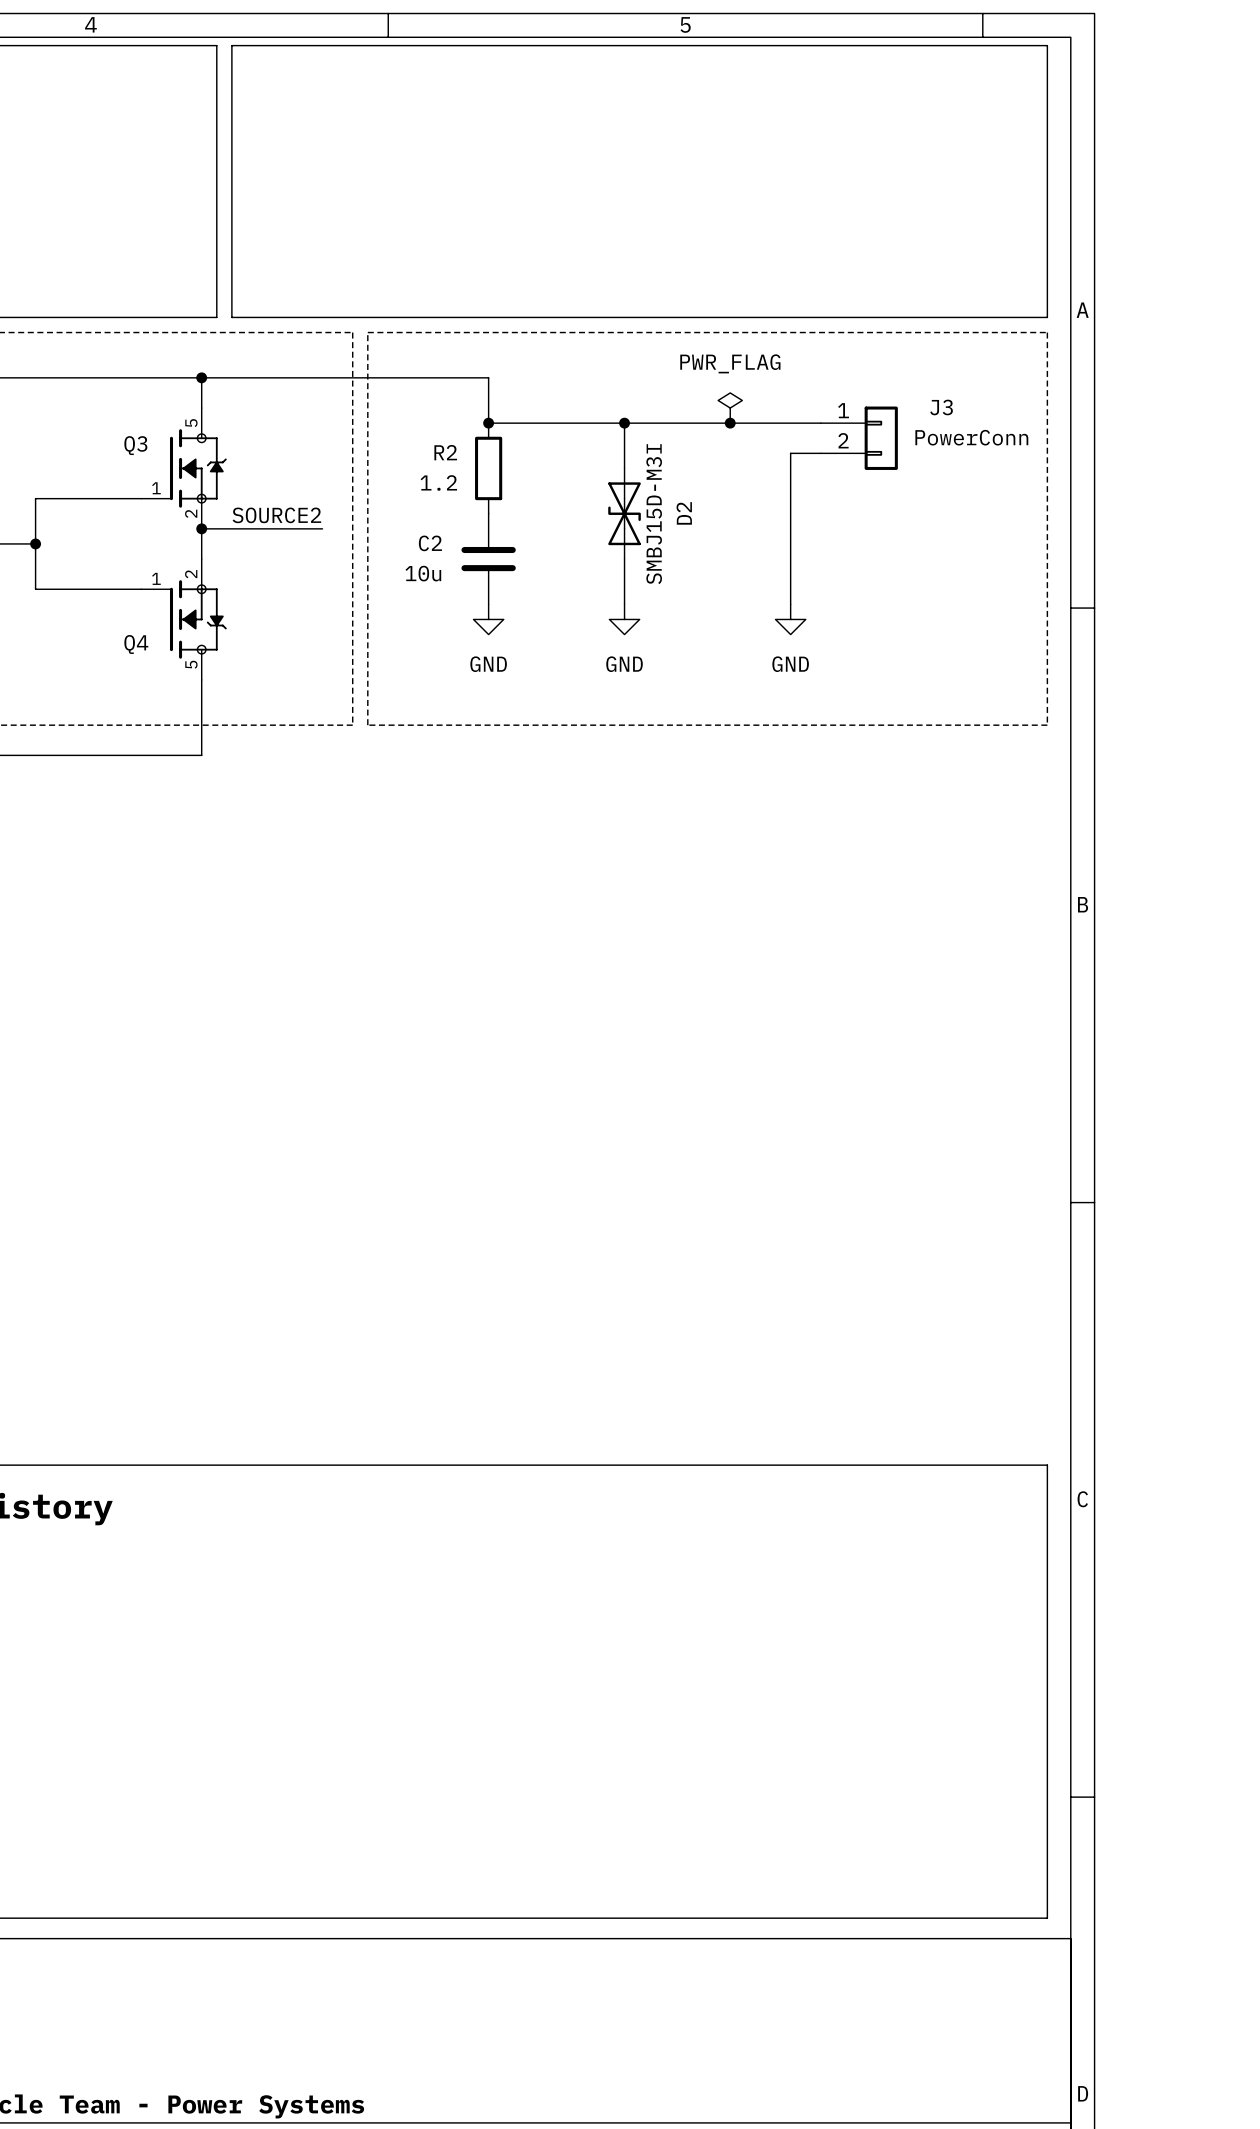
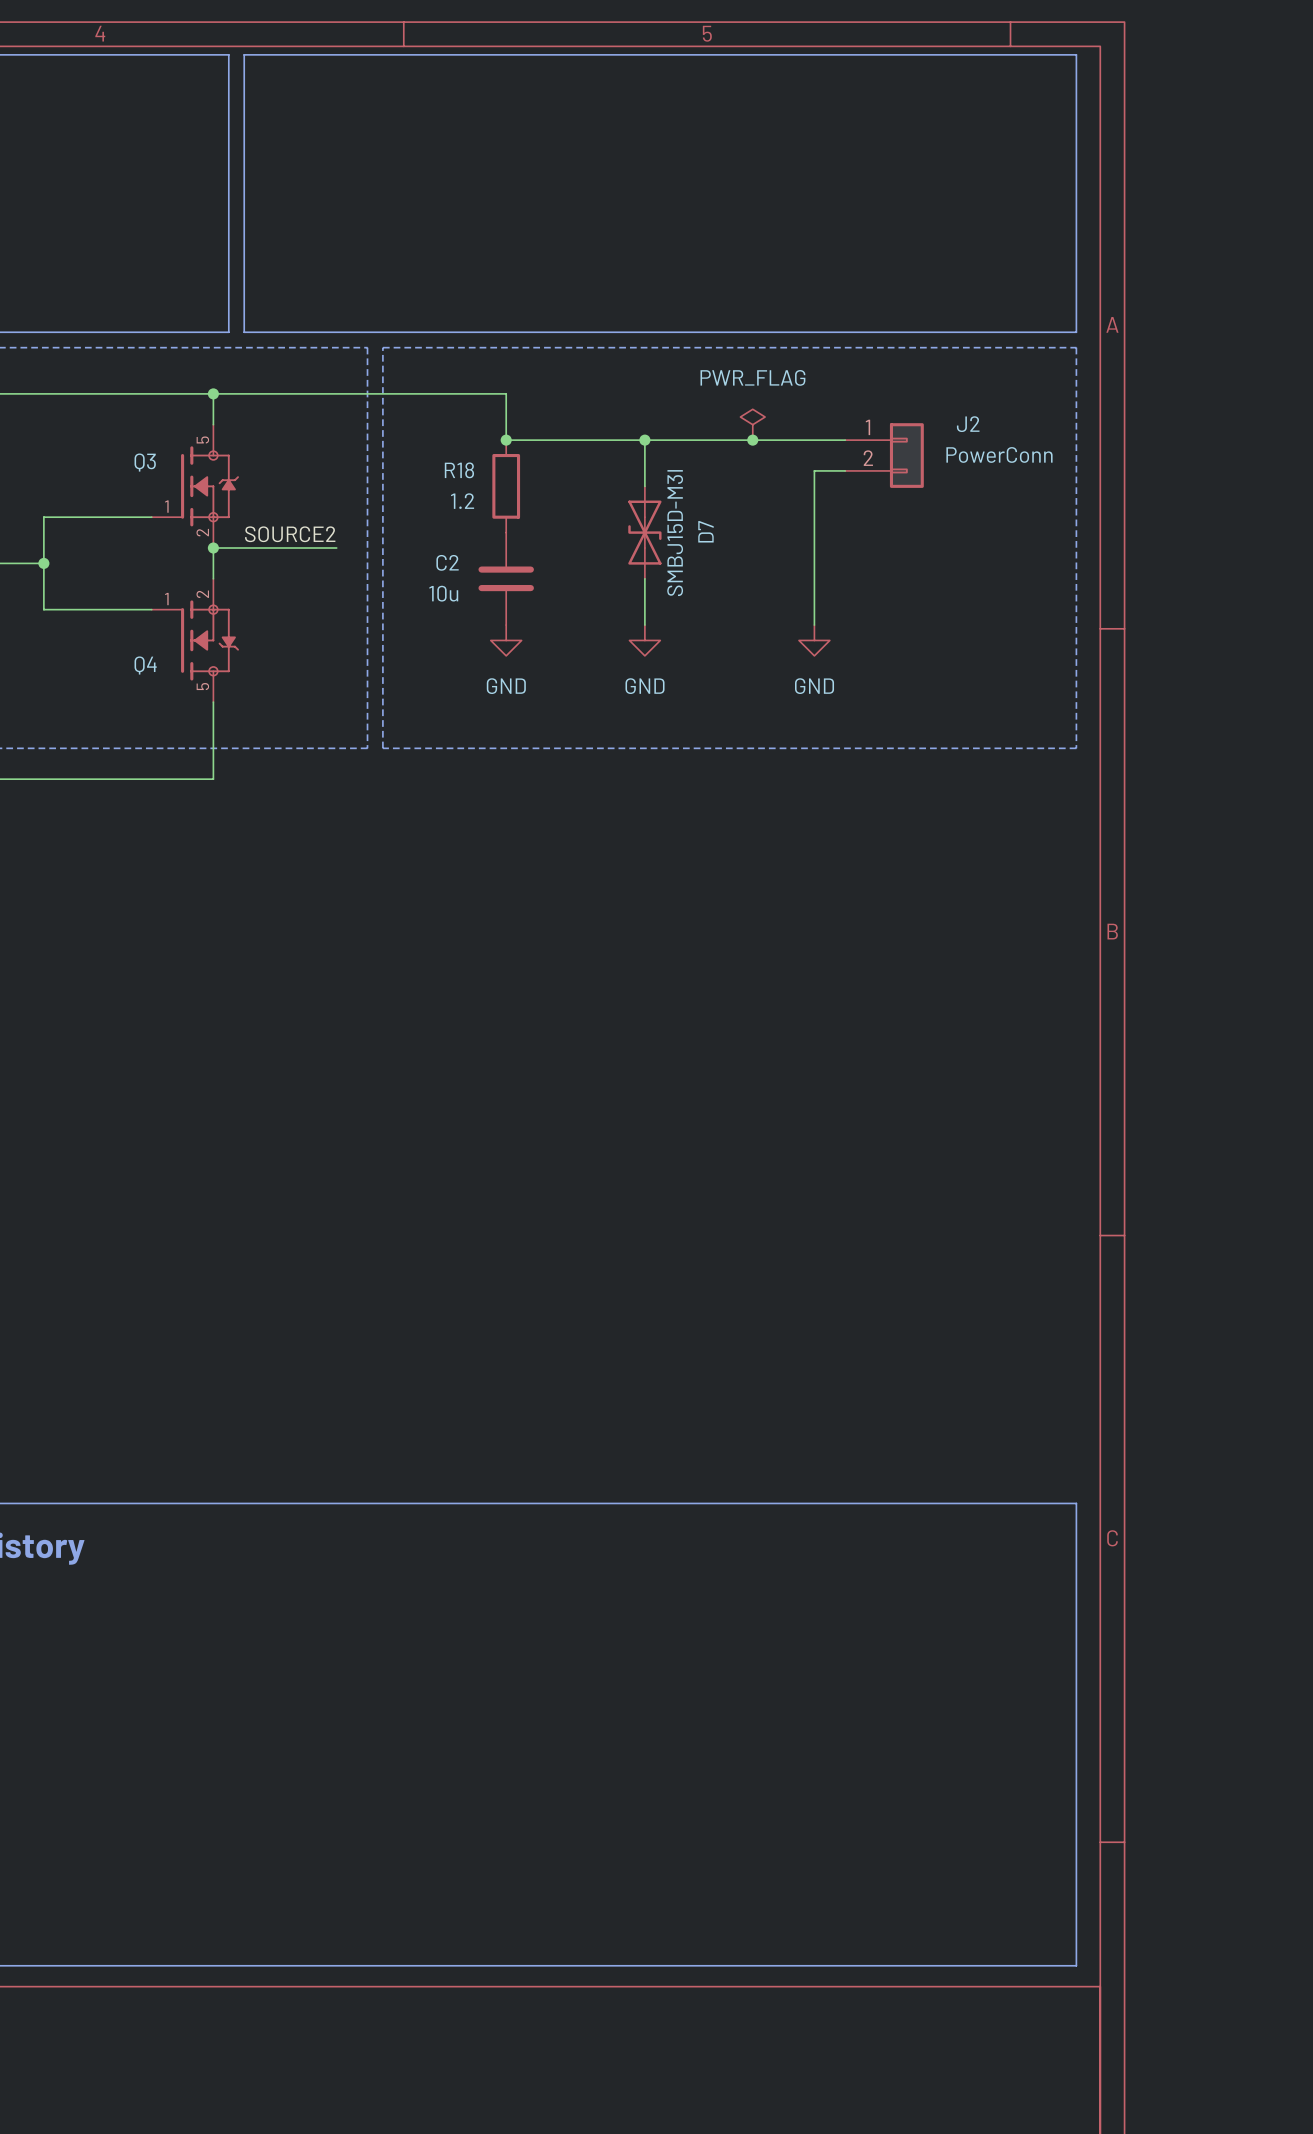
J3 name: J3 (941, 407) -> J2 (968, 424)
R2 name: R2 (445, 452) -> R18 (459, 470)
D2 name: D2 (684, 513) -> D7 (705, 531)

